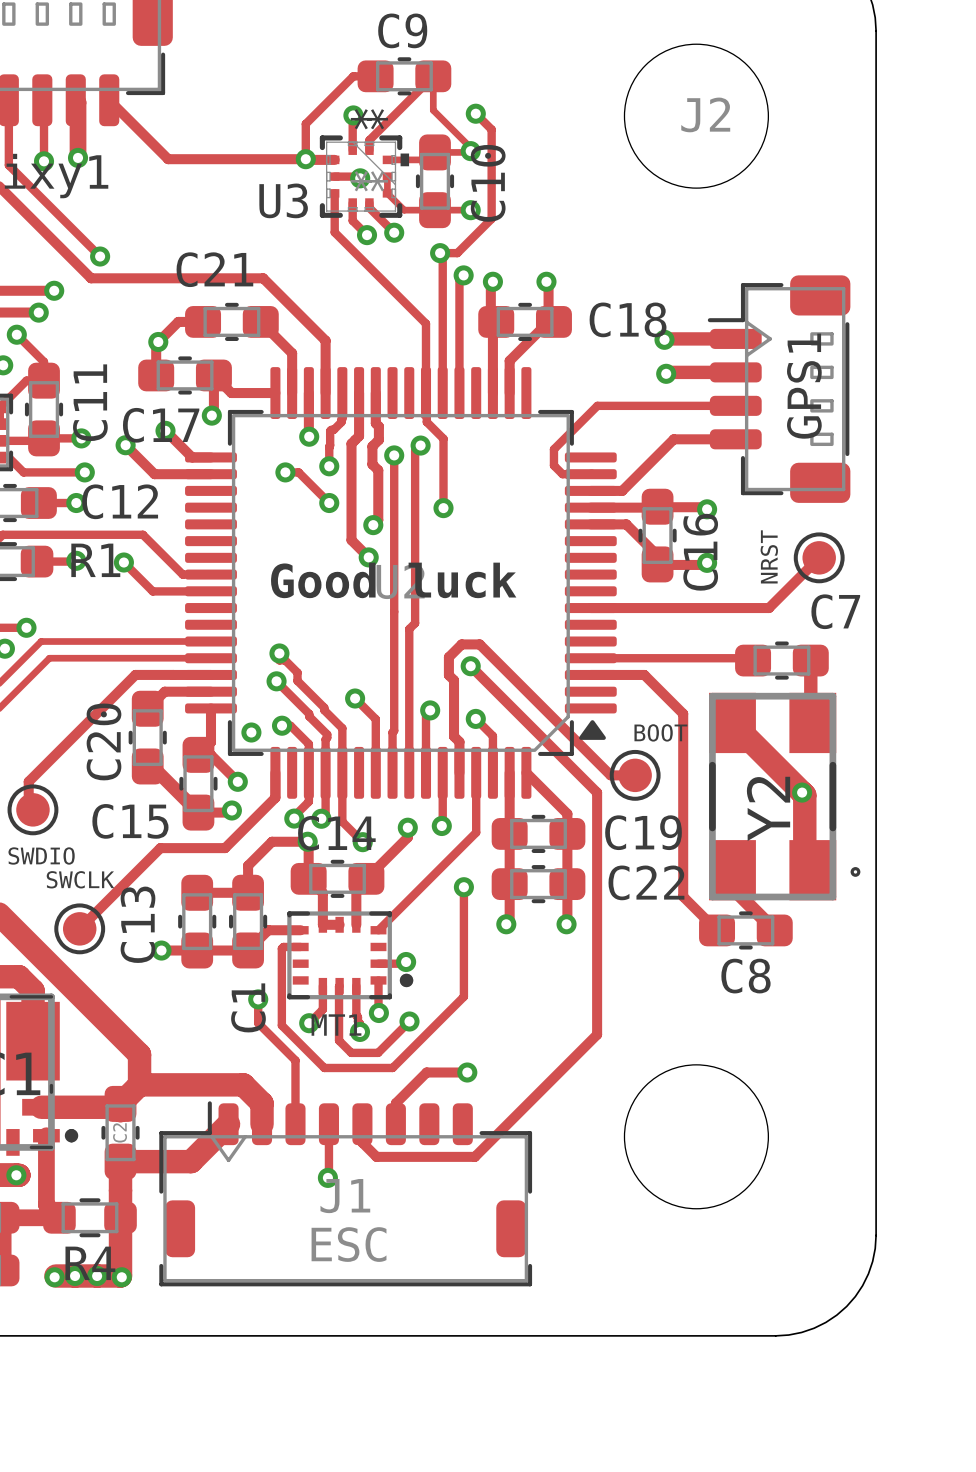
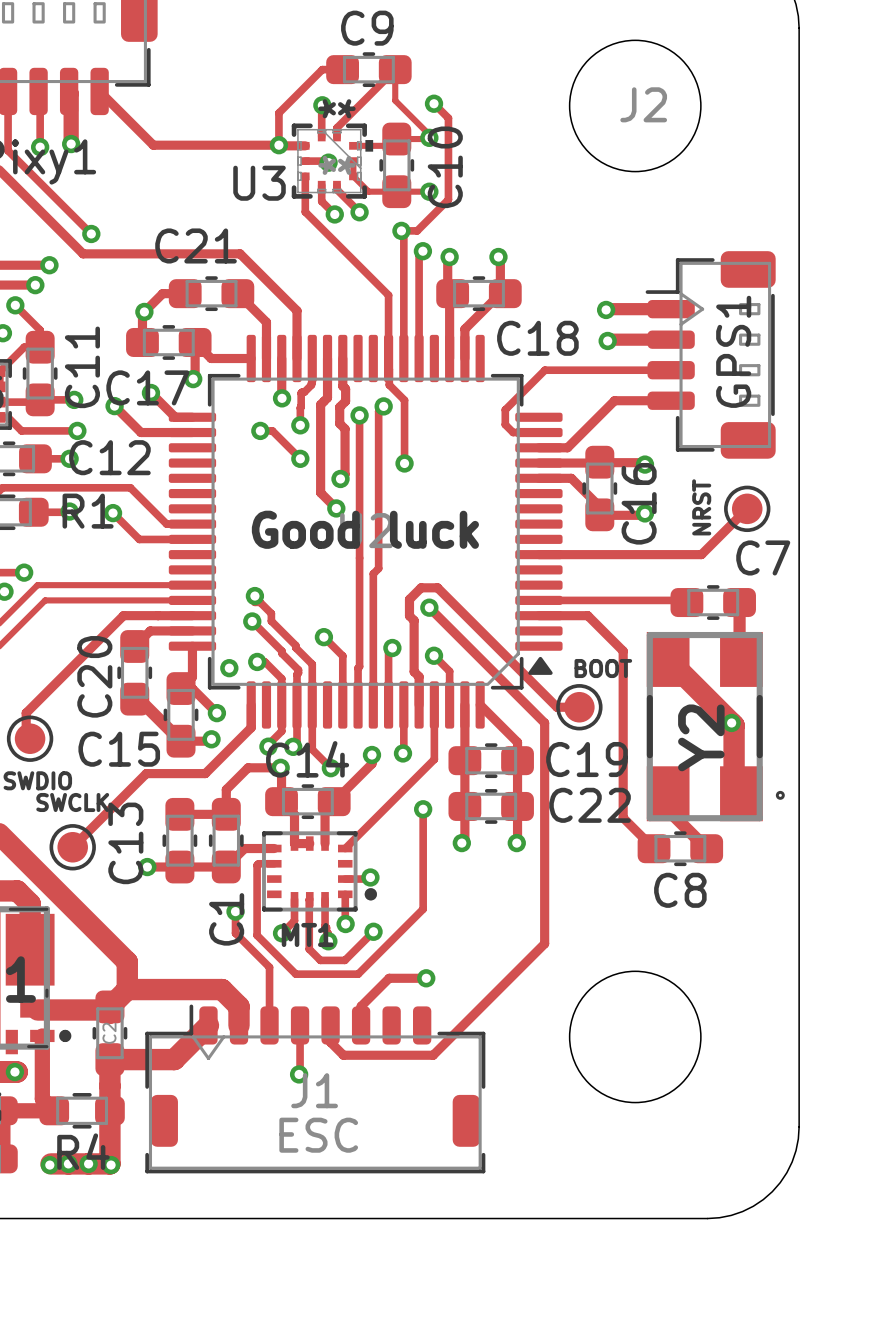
C18 name position: C18 (628, 319) -> C18 (537, 338)

